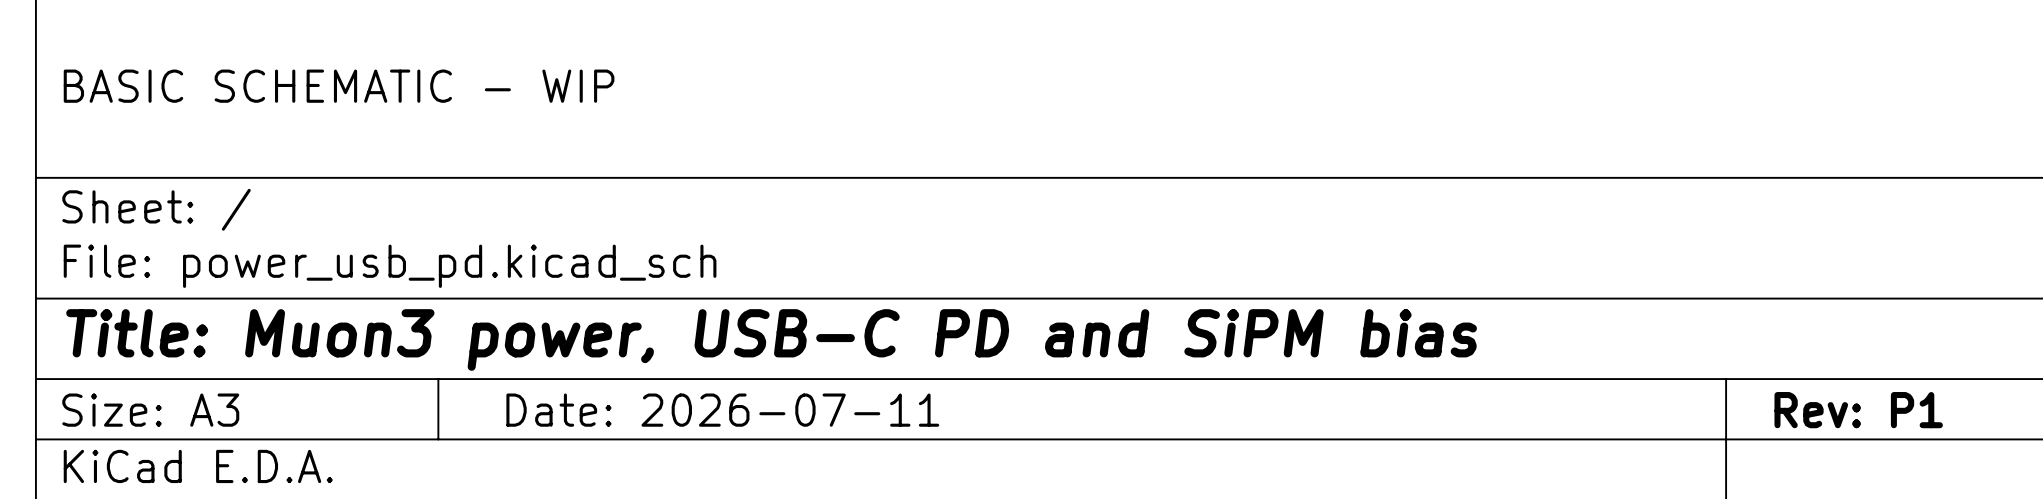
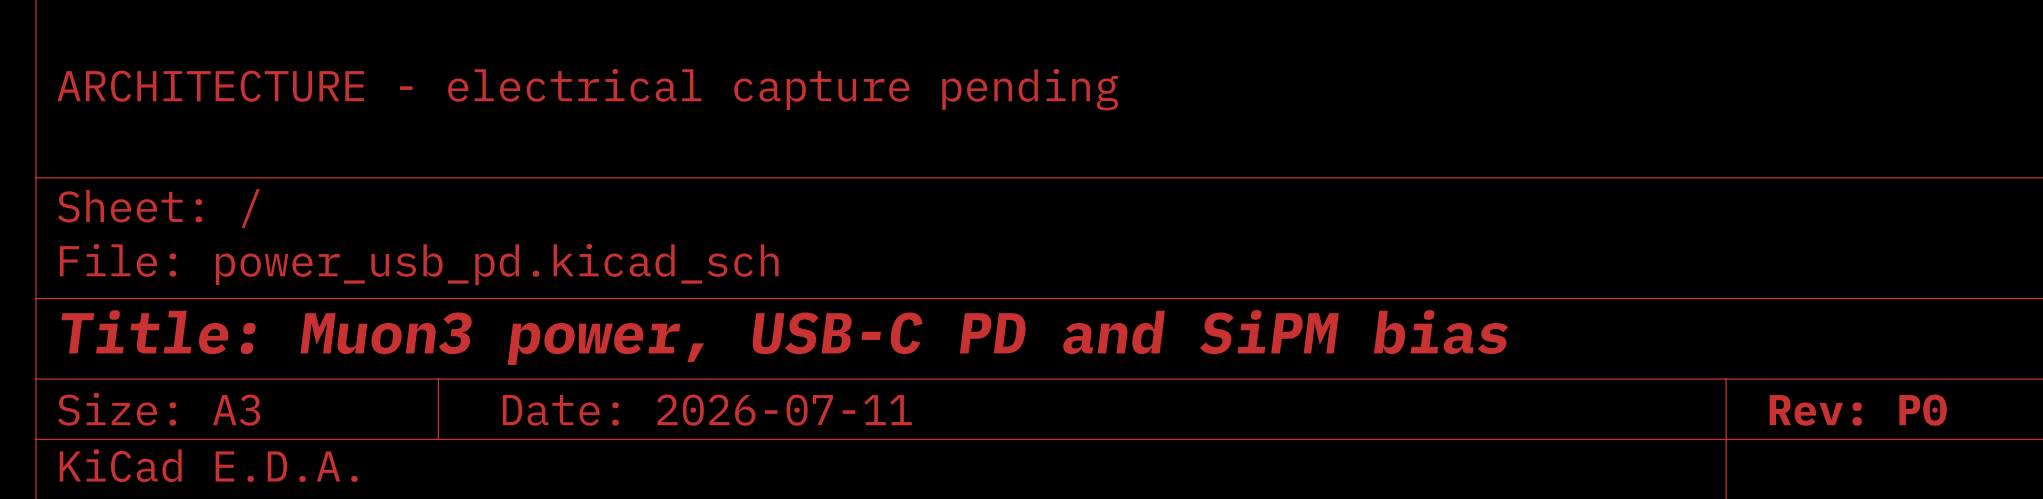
title block: BASIC SCHEMATIC - WIP (339, 86) -> ARCHITECTURE - electrical capture pending (587, 89)
title block: Rev: P1 (1858, 410) -> Rev: P0 (1858, 410)

